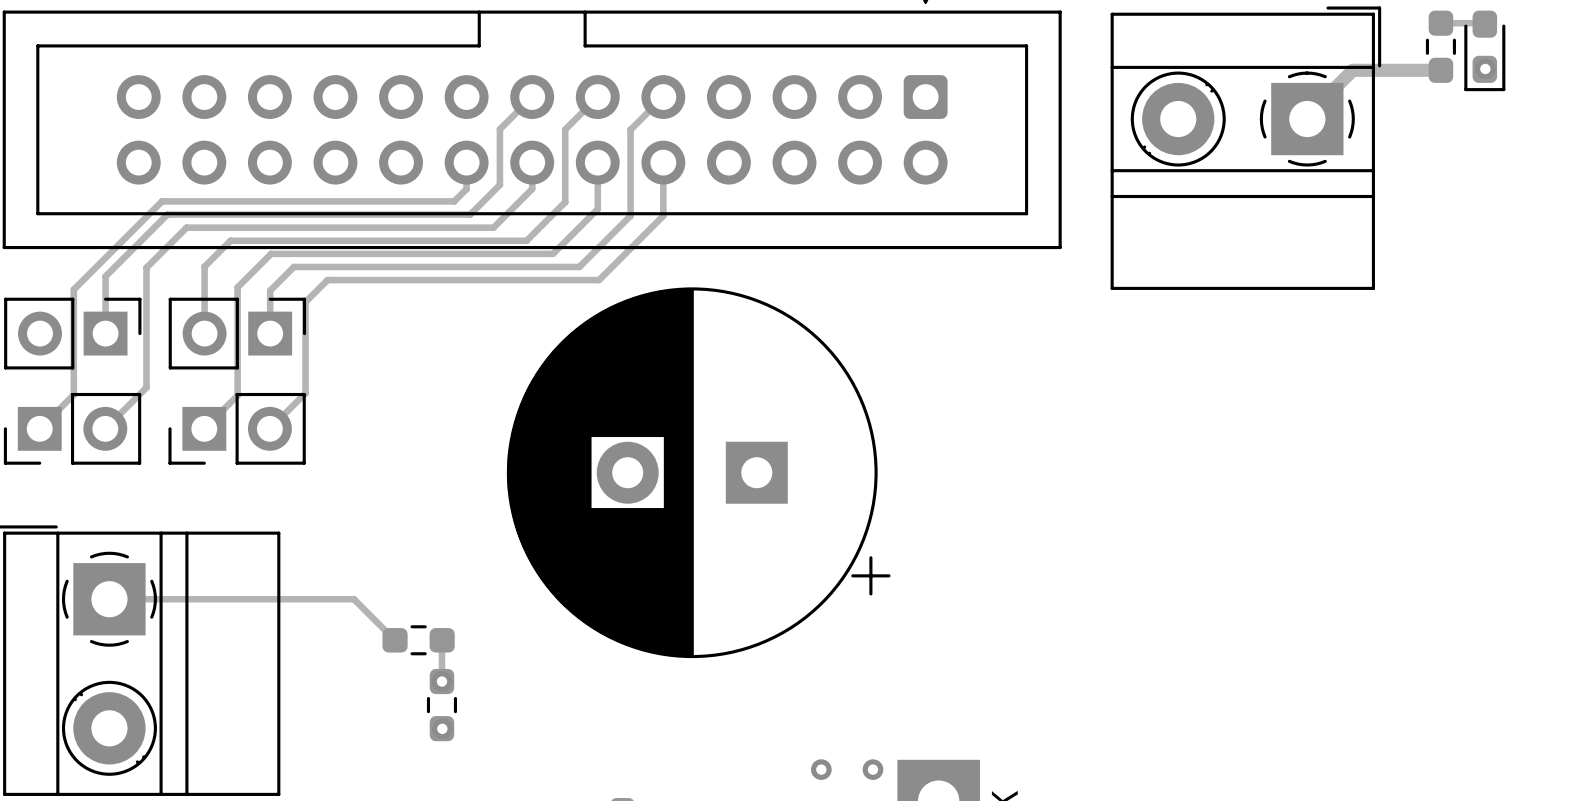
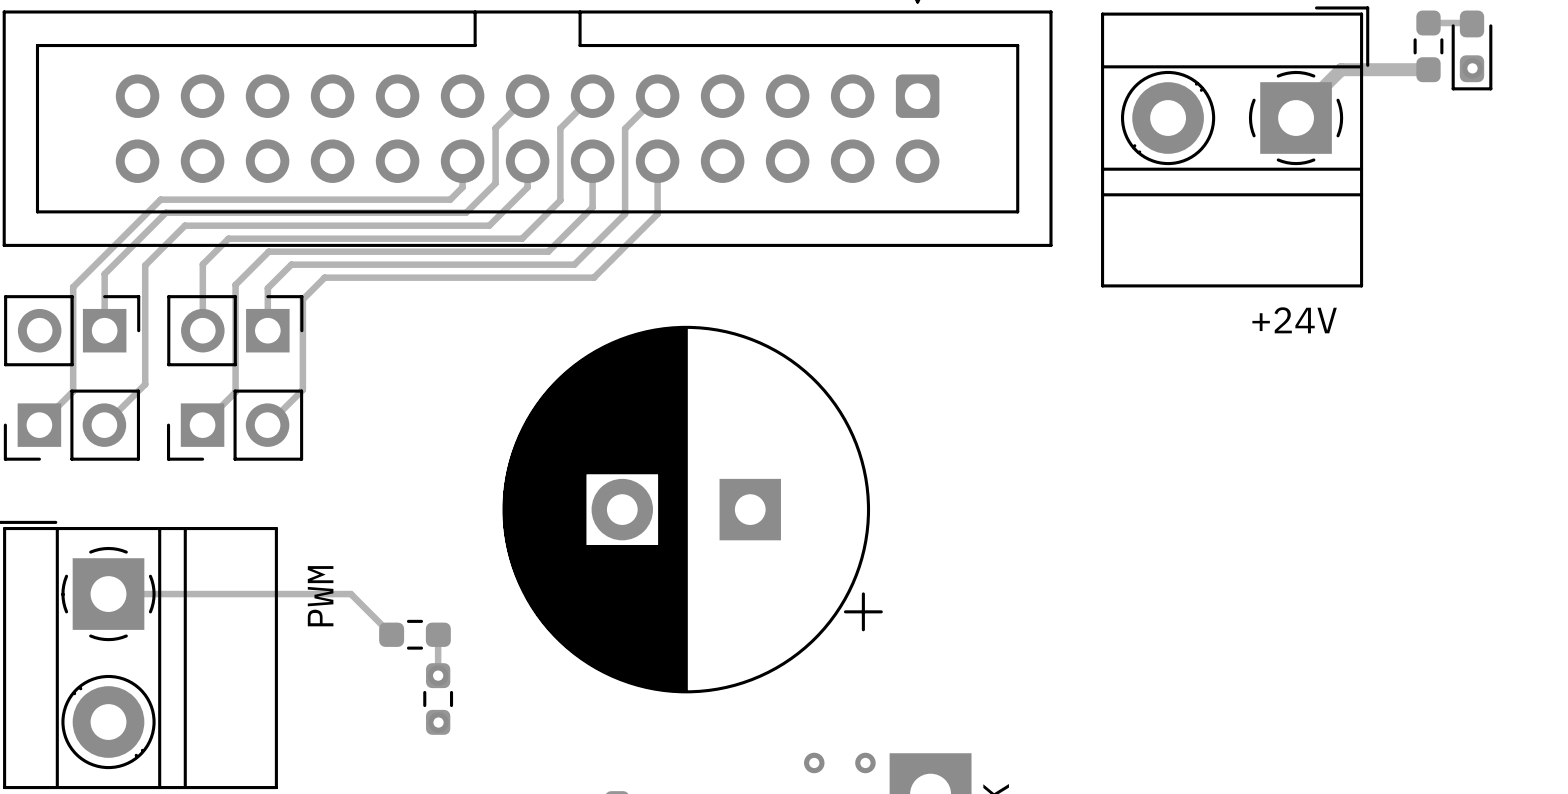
text: none -> +24V (1294, 320)
part position: (698, 472) -> (692, 509)
text: none -> PWM (320, 596)

